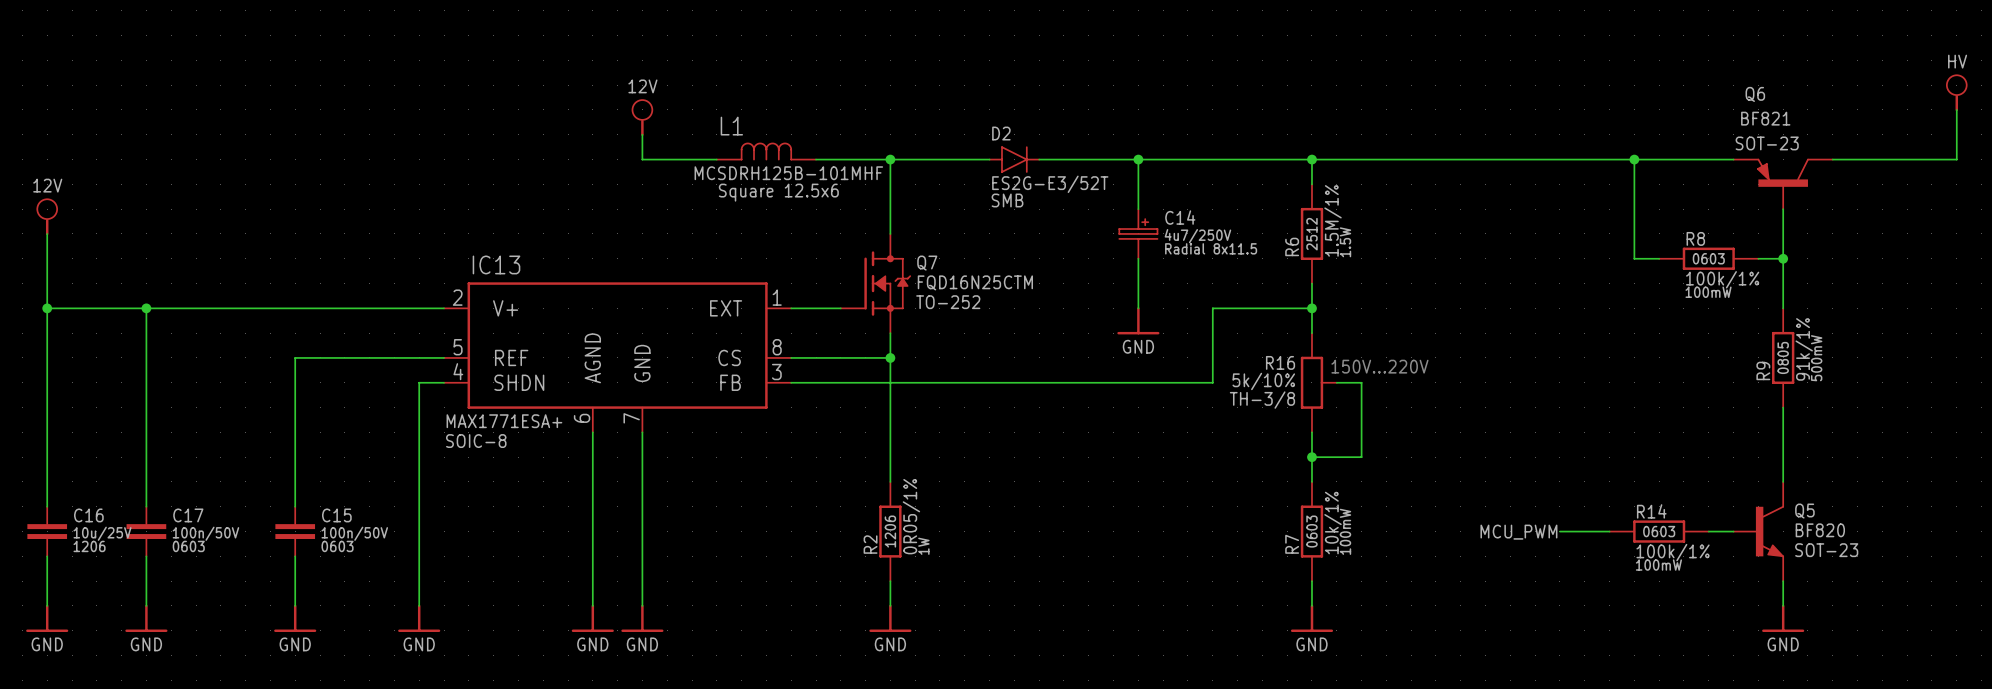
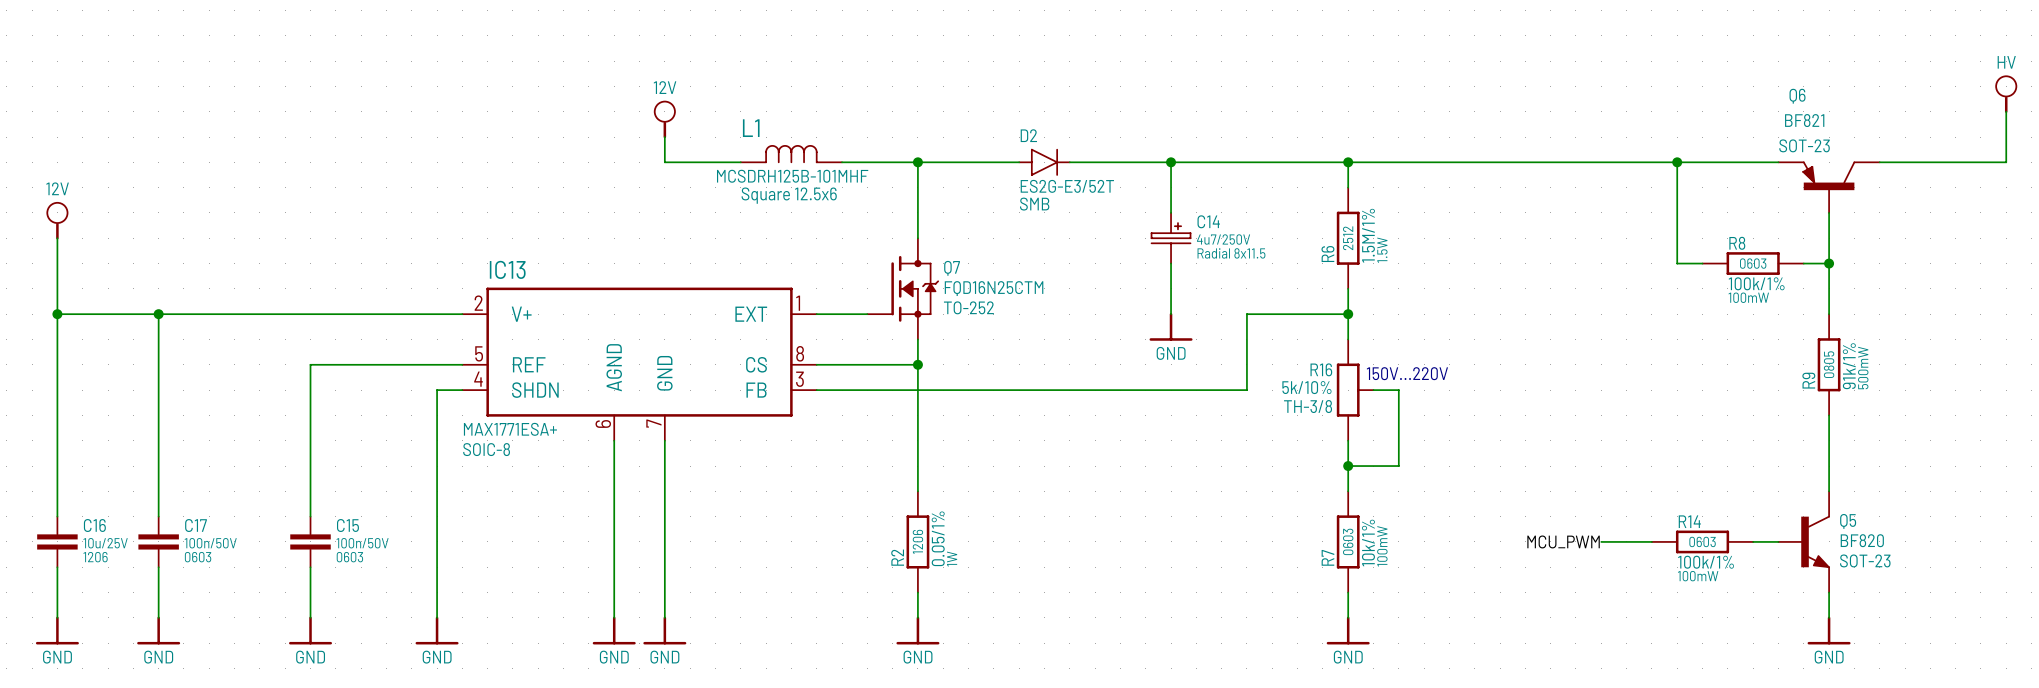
R2 value: 0R05/1% (911, 516) -> 0.05/1% (938, 538)

